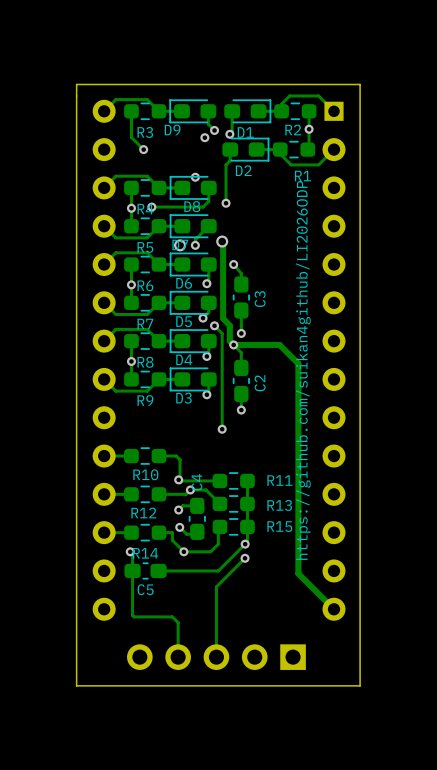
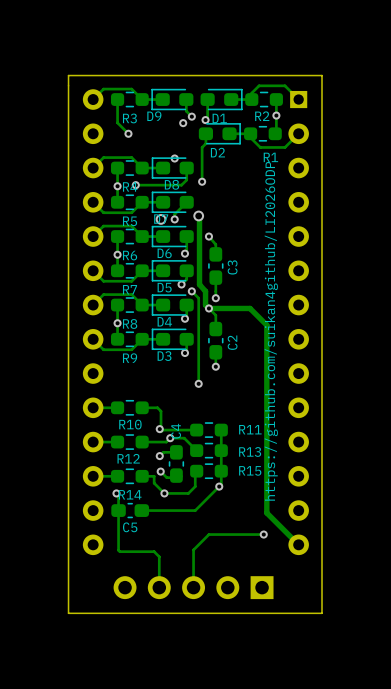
track: (245, 558) (216, 586) (216, 615) -> (263, 534) (208, 534) (193, 549)
via position: (245, 558) -> (263, 534)

